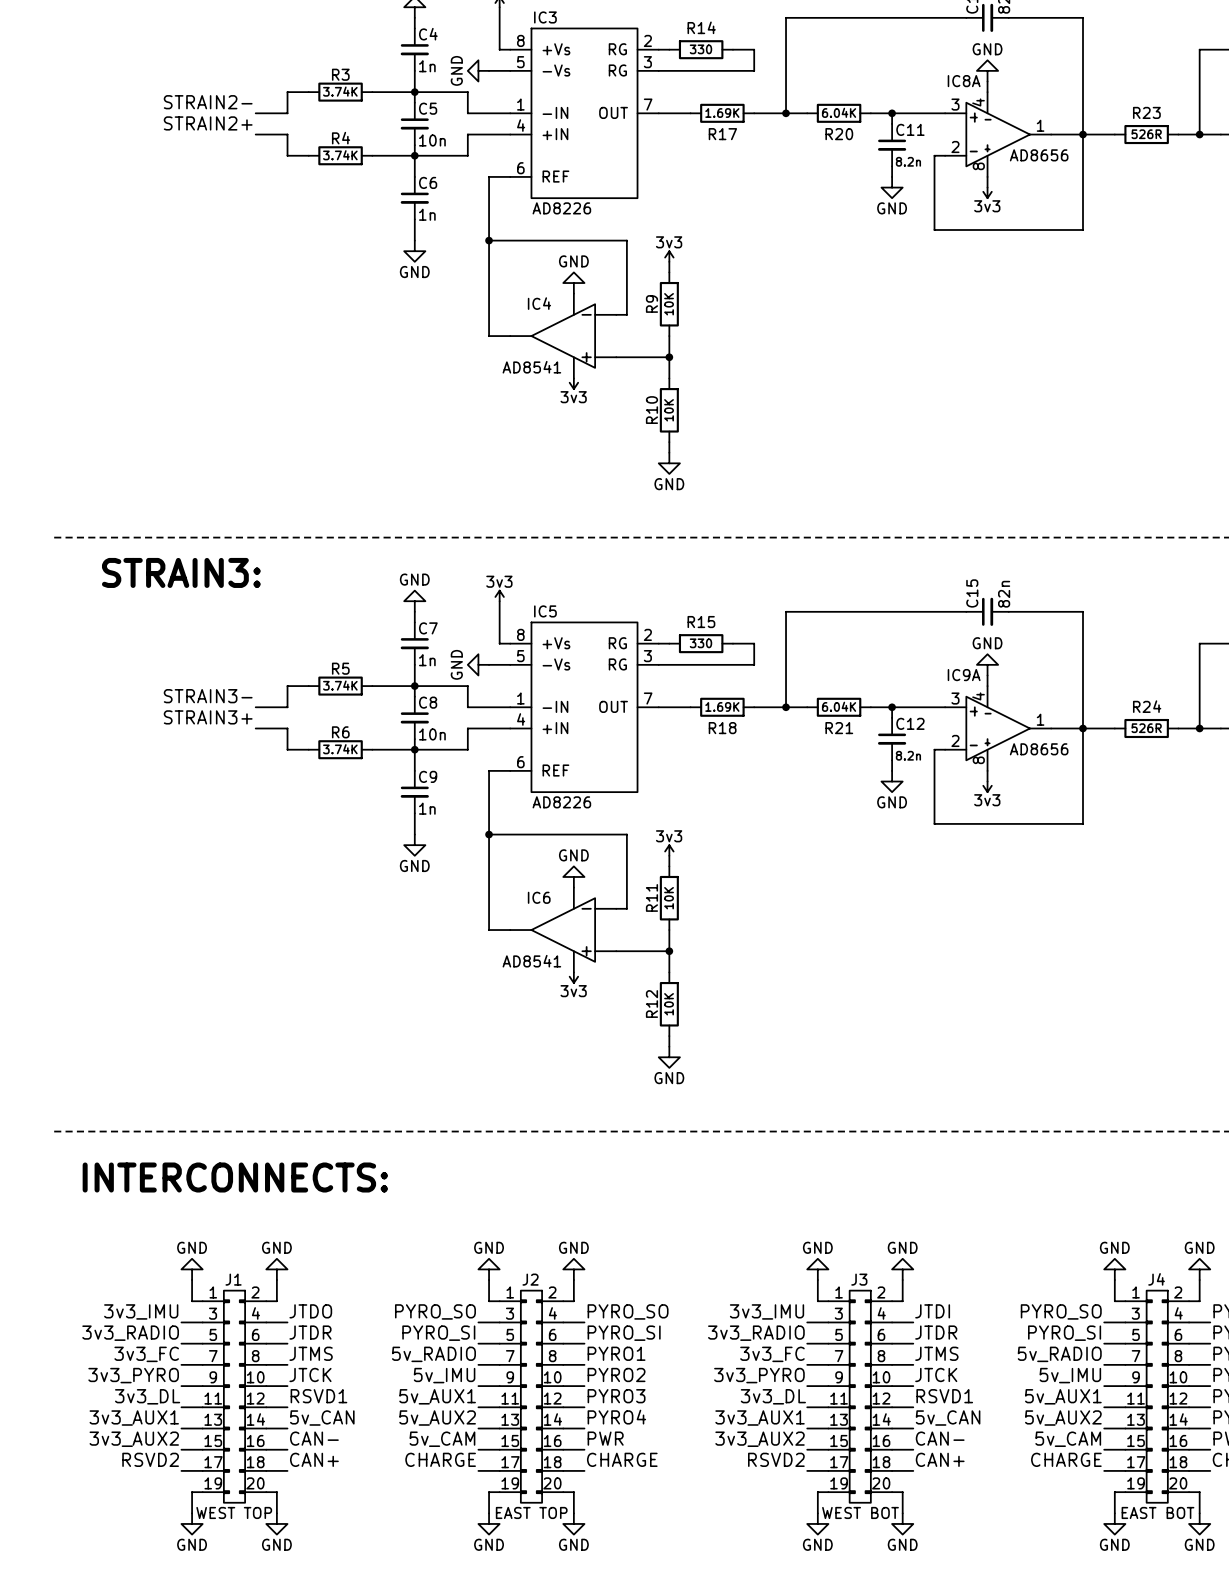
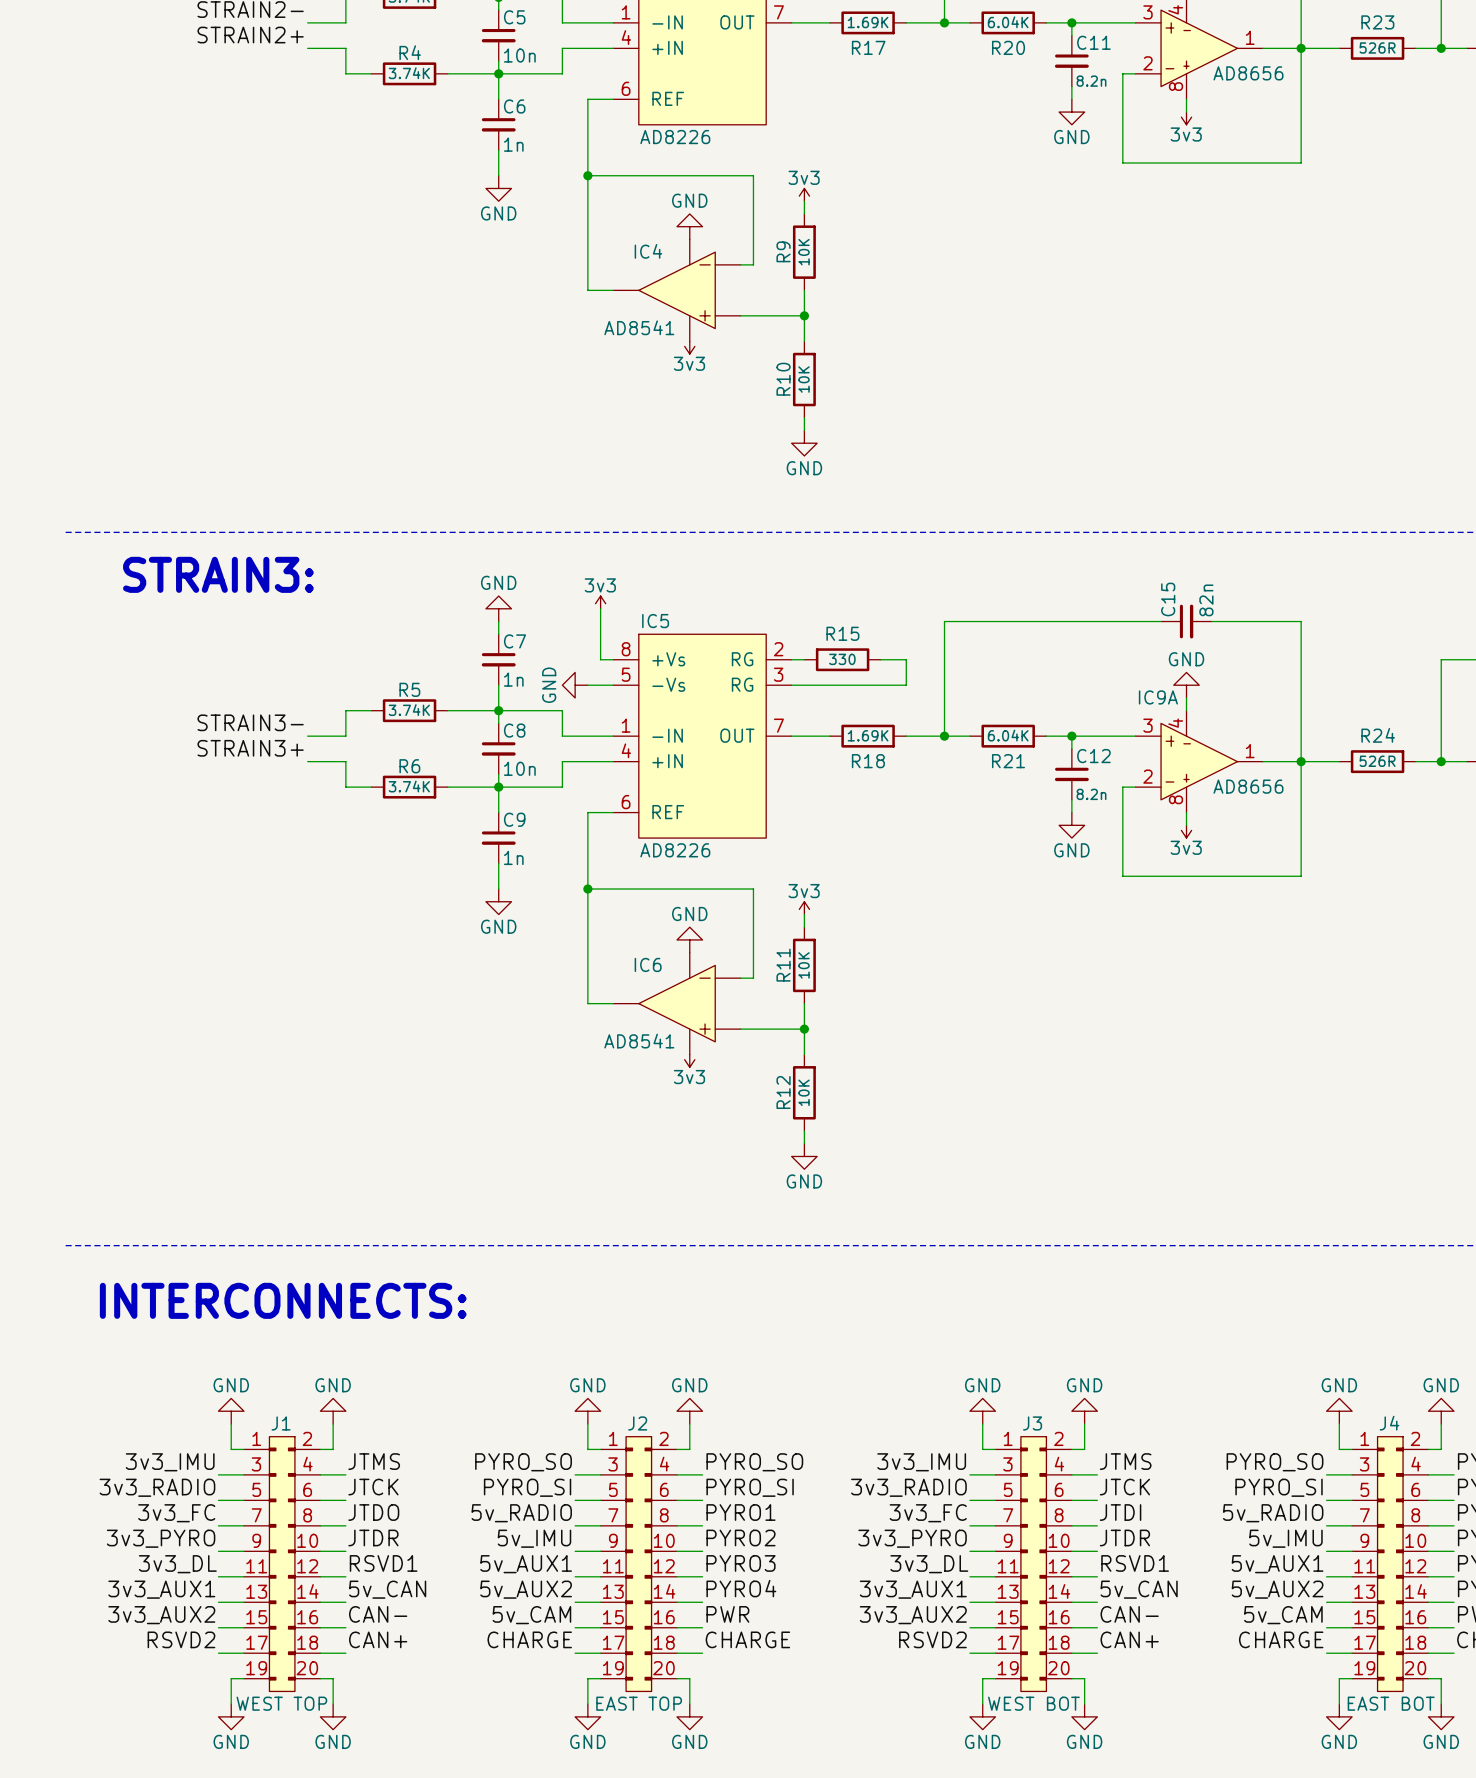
label: JTDO (310, 1311) -> JTMS (374, 1461)
label: JTDI (932, 1311) -> JTMS (1125, 1461)
label: JTDR (310, 1332) -> JTCK (373, 1487)
label: JTDR (936, 1332) -> JTCK (1124, 1487)
label: JTMS (311, 1353) -> JTDO (373, 1512)
label: JTMS (936, 1353) -> JTDI (1120, 1512)
label: JTCK (310, 1374) -> JTDR (373, 1537)
label: JTCK (936, 1374) -> JTDR (1124, 1537)

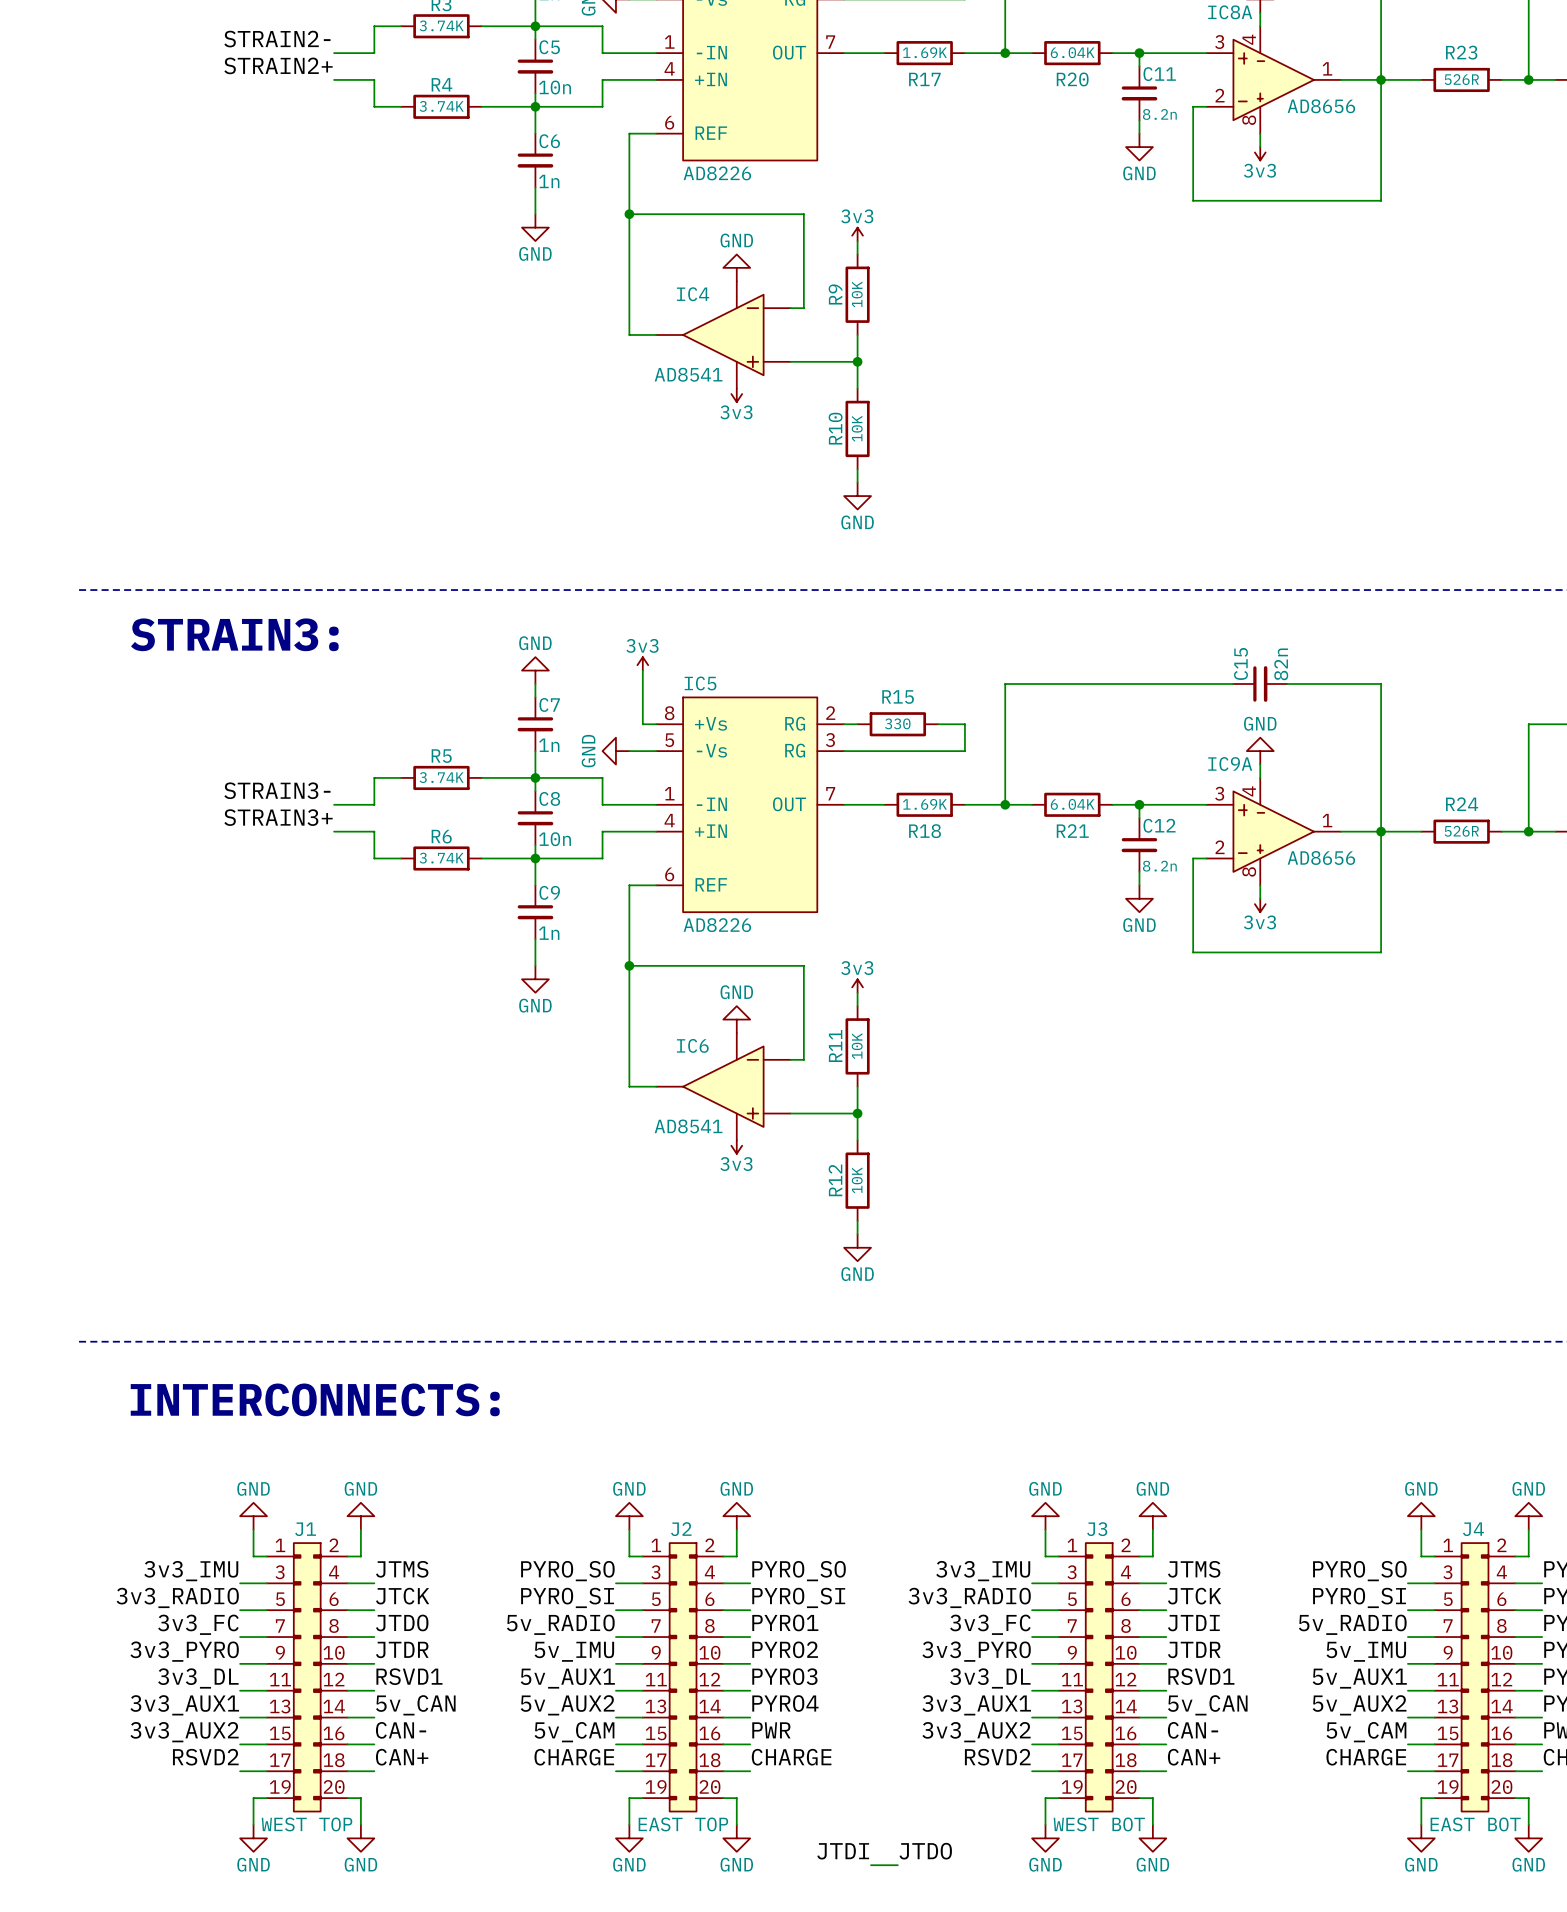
label: none -> JTDI (843, 1851)
label: none -> JTDO (925, 1851)
wire: none -> (871, 1865) (897, 1865)

